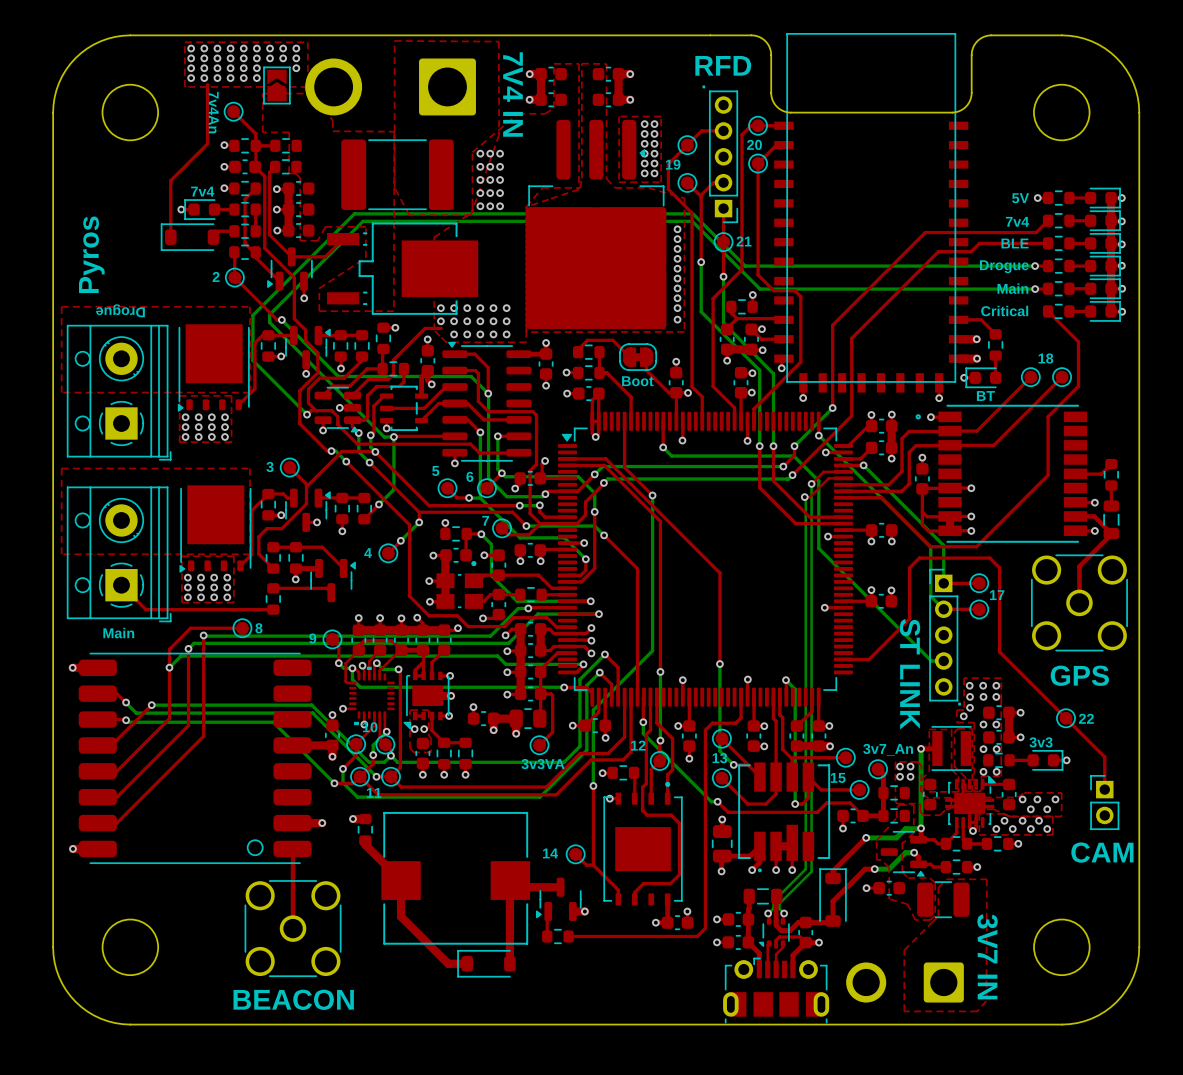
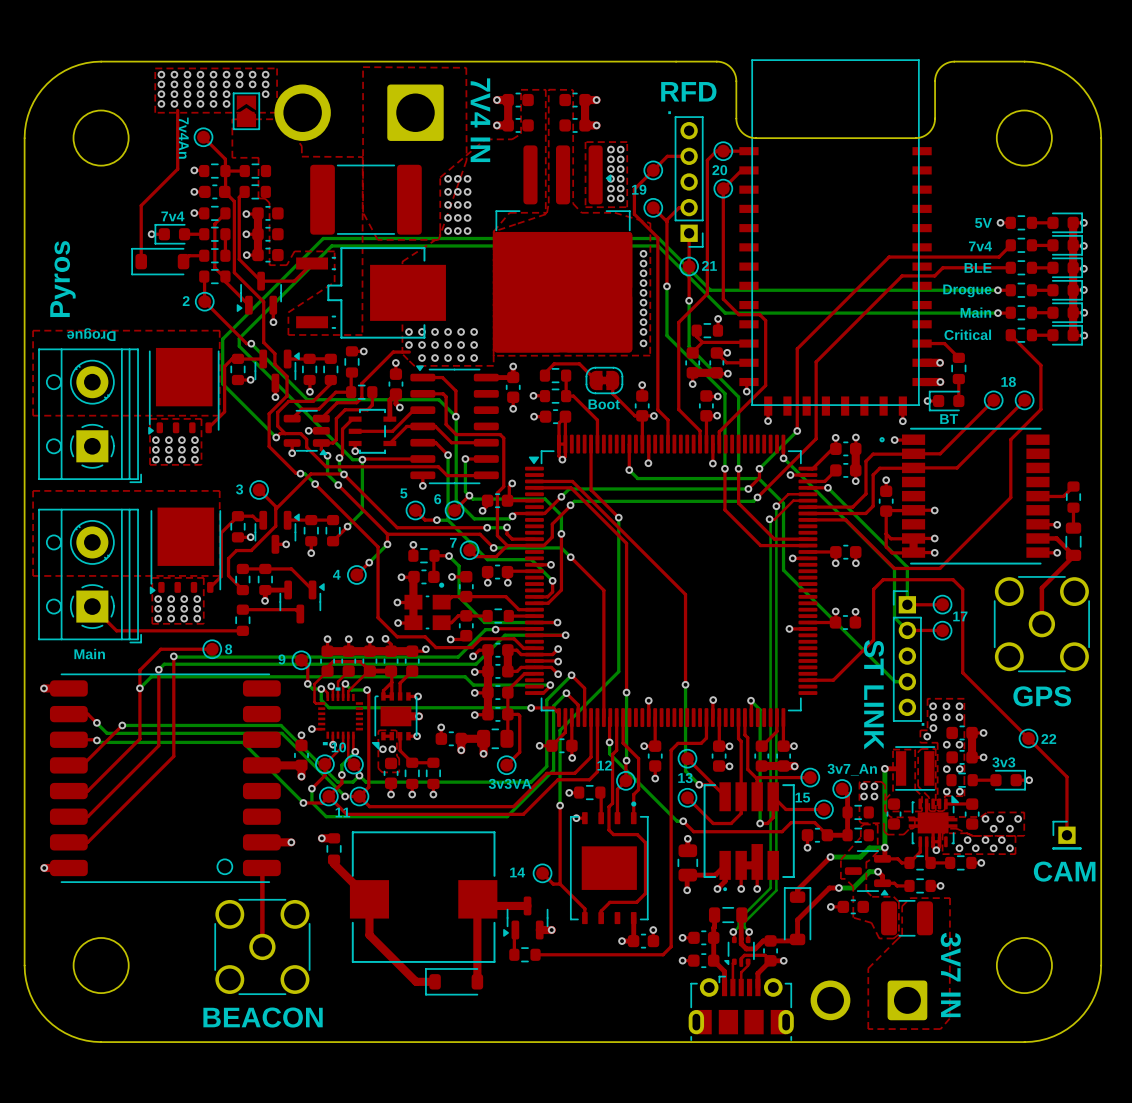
top track: none -> (1066, 809) (1066, 835)
part: (1104, 802) -> none
part: none -> (1066, 835)

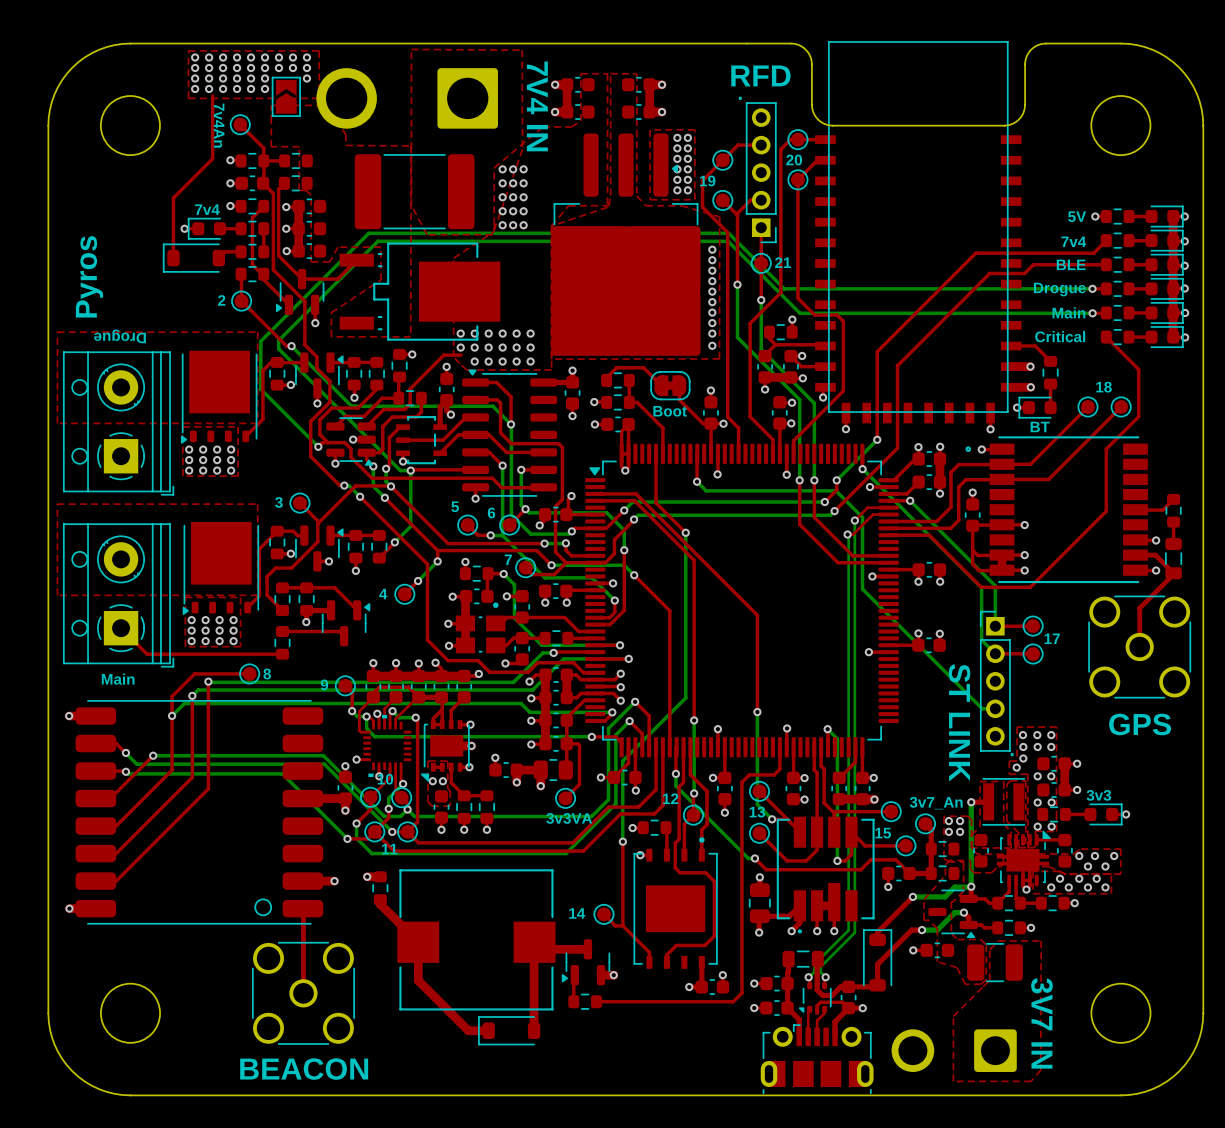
top track: (807, 680) (833, 680) (873, 639) (873, 589) (883, 579) (953, 579) (962, 589) (962, 672) (1066, 776) (1066, 835) -> none
part: (1028, 738) -> none
text: 22 (1048, 738) -> none
part: (1066, 835) -> none
text: CAM (1064, 871) -> none

